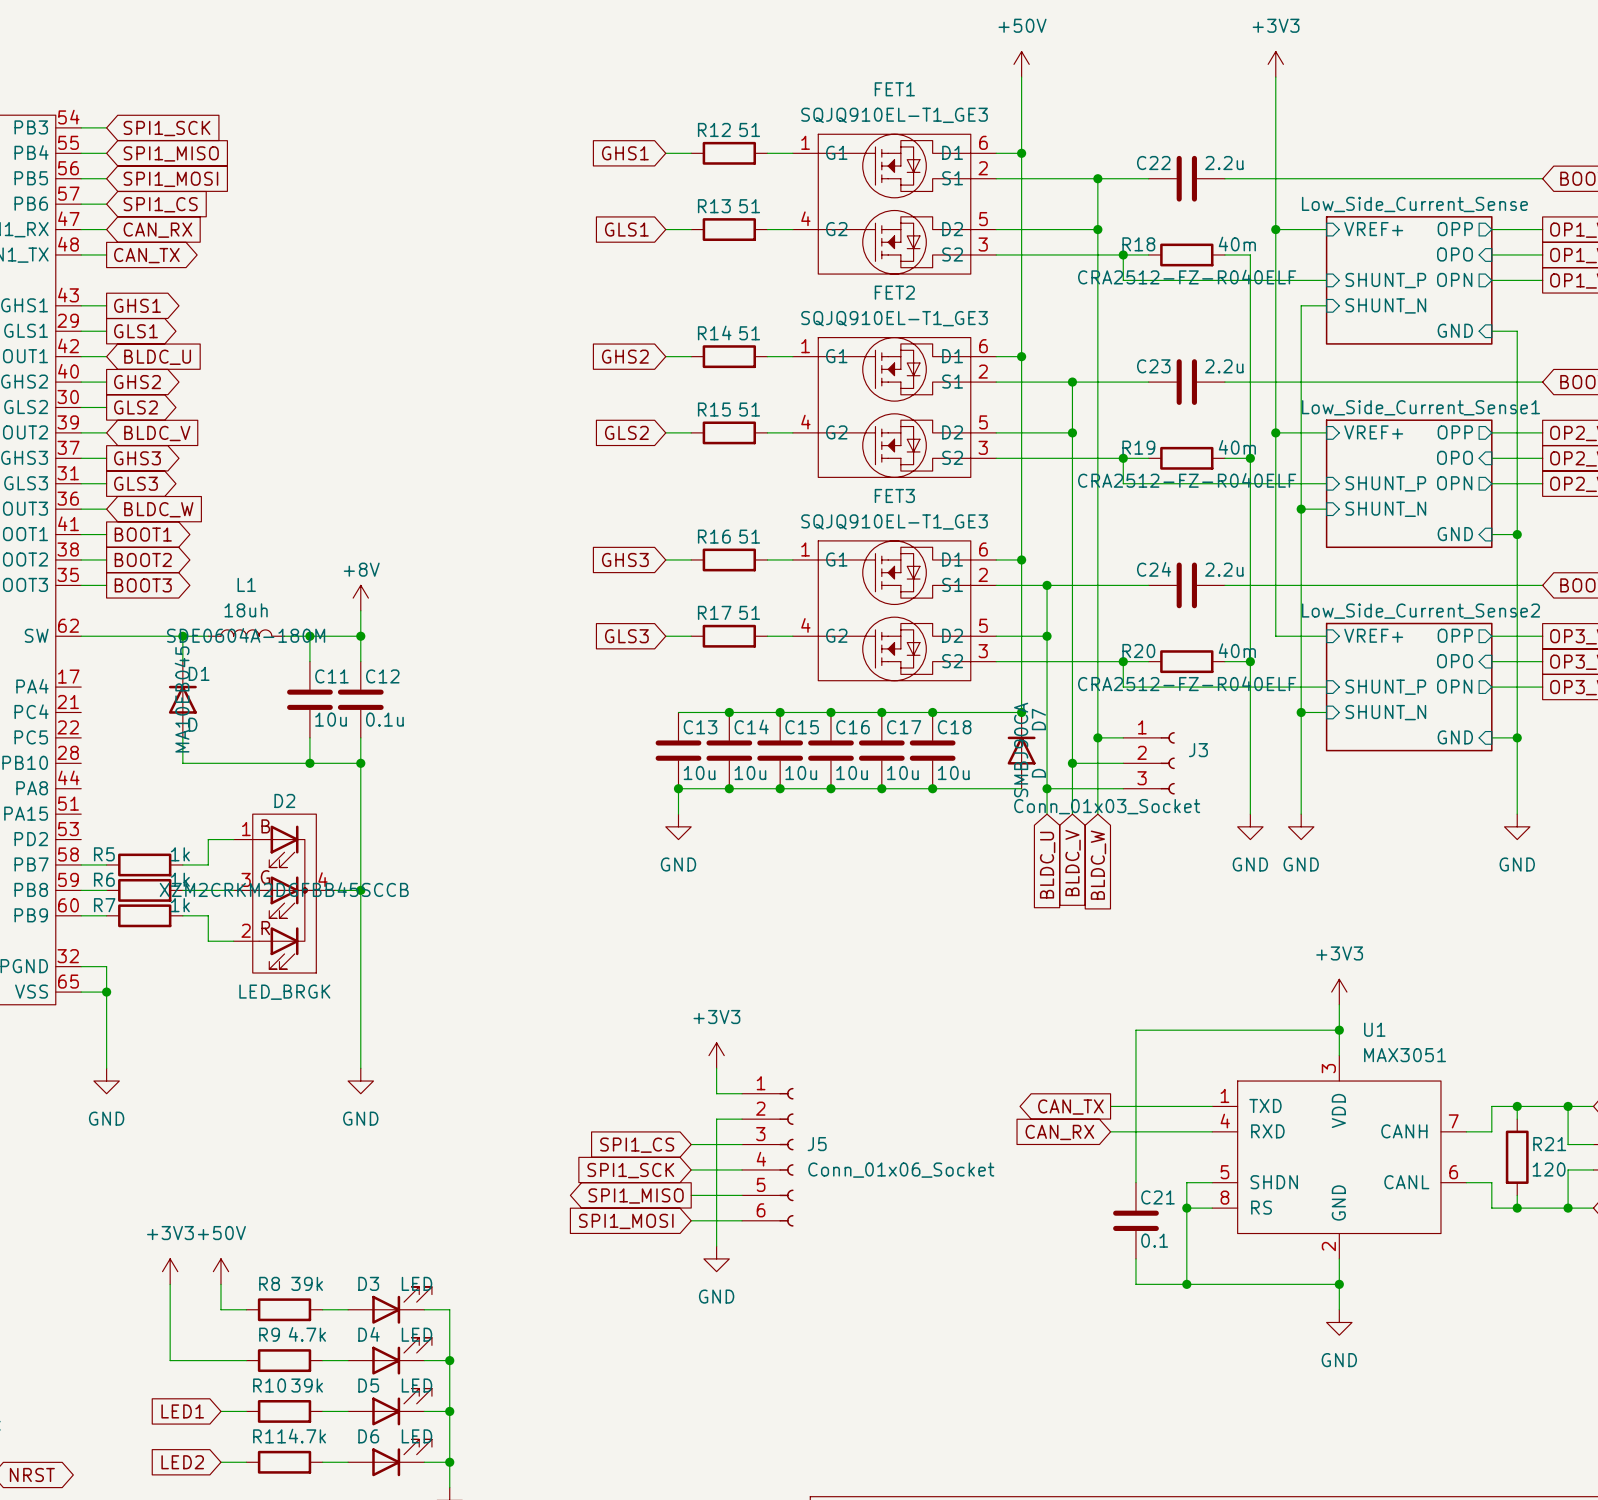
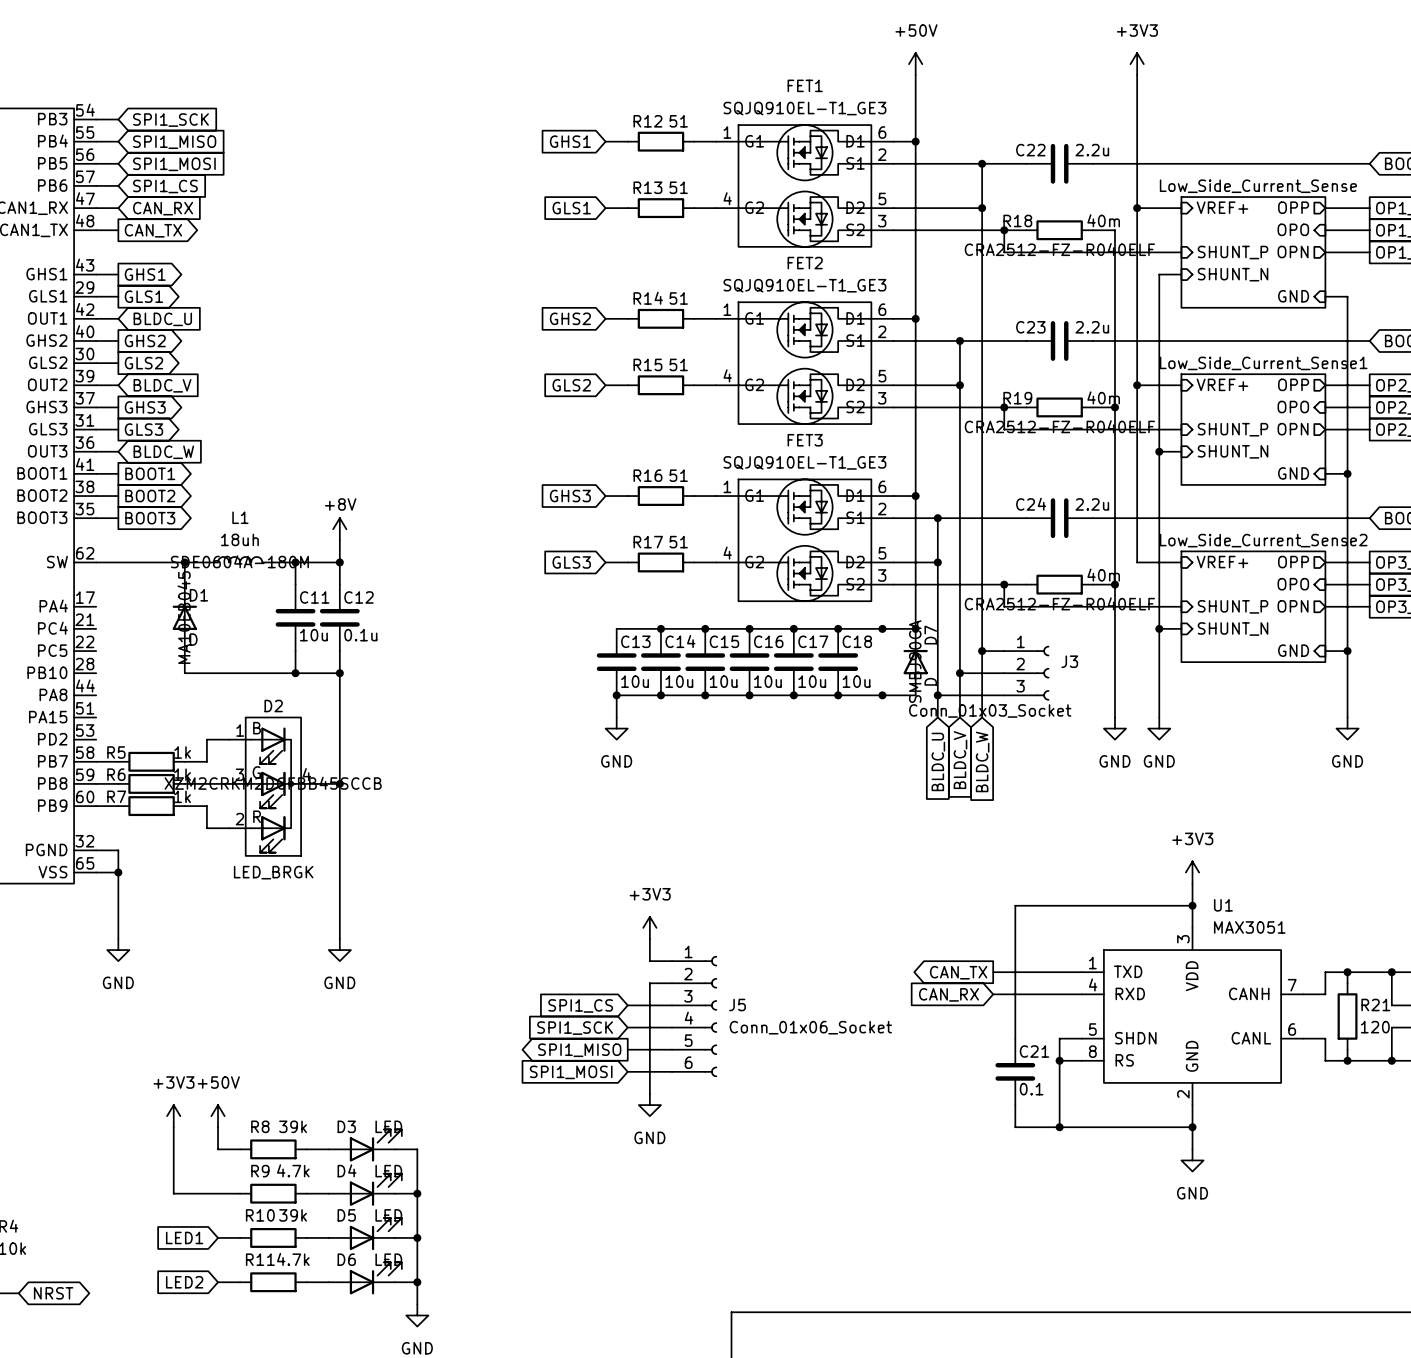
R20 name: R20 (1138, 651) -> none
junction: none -> (882, 628)
junction: none -> (882, 695)

